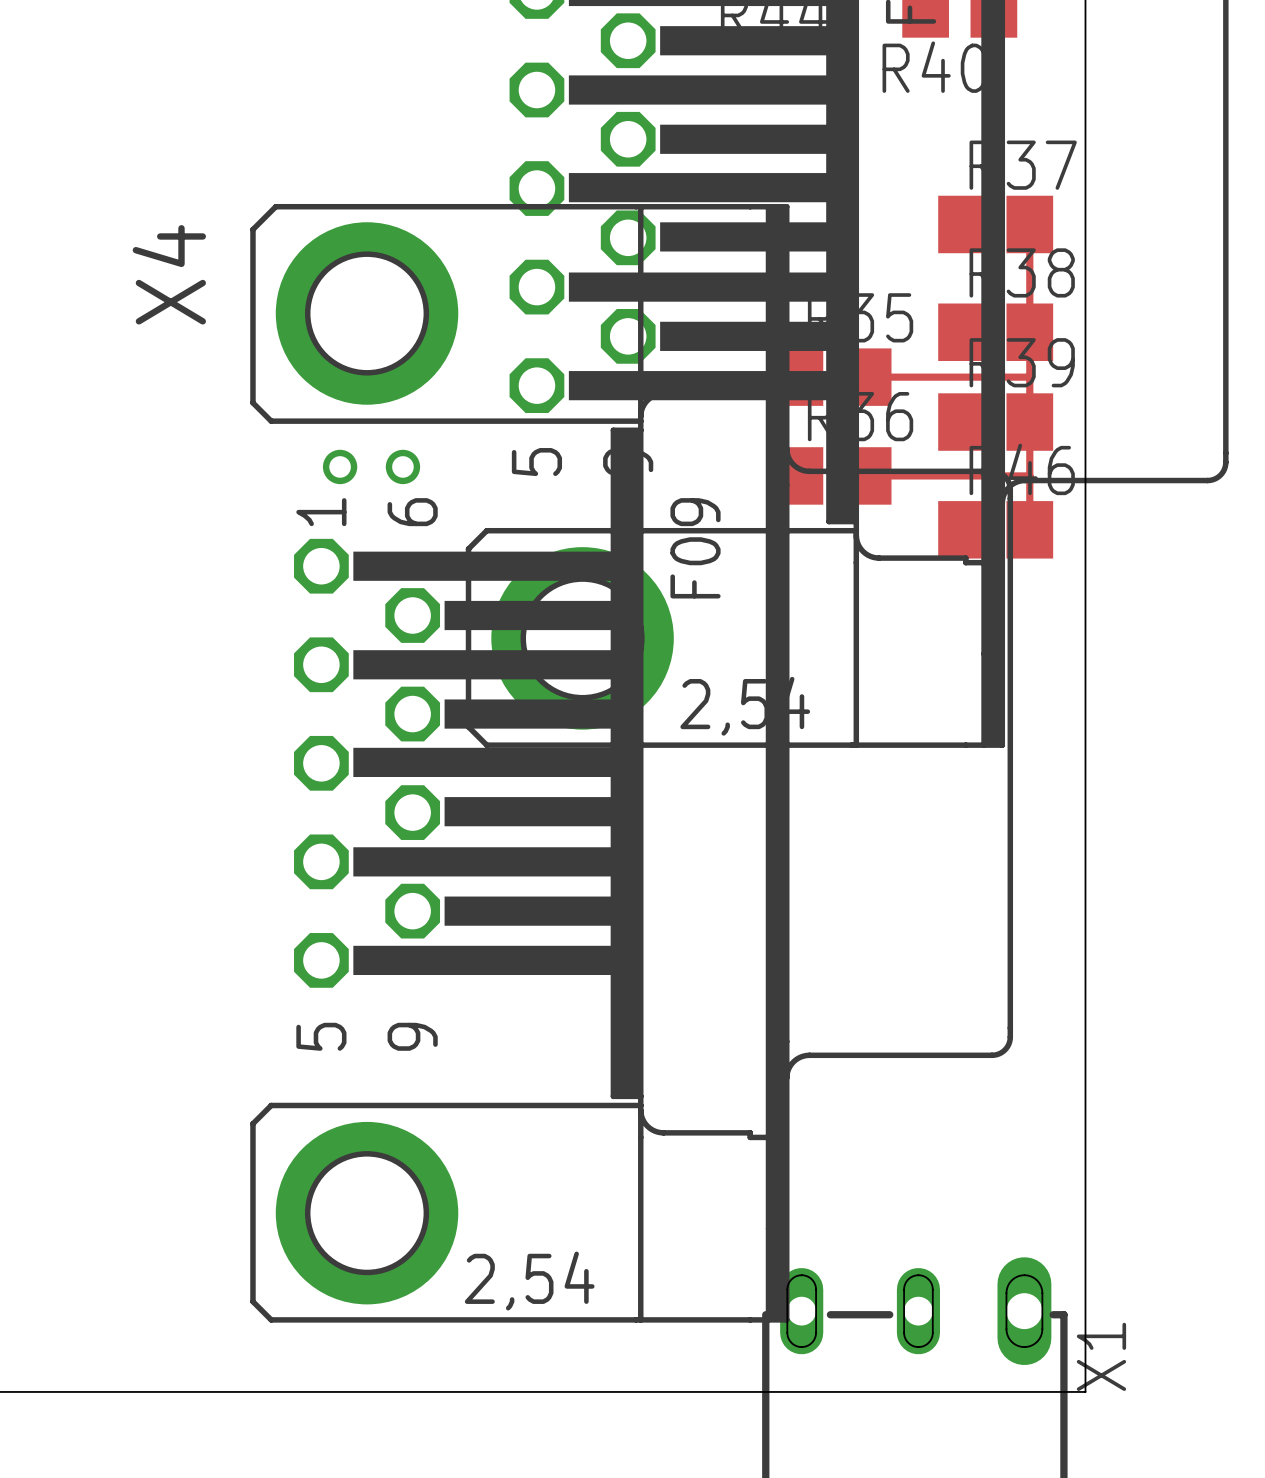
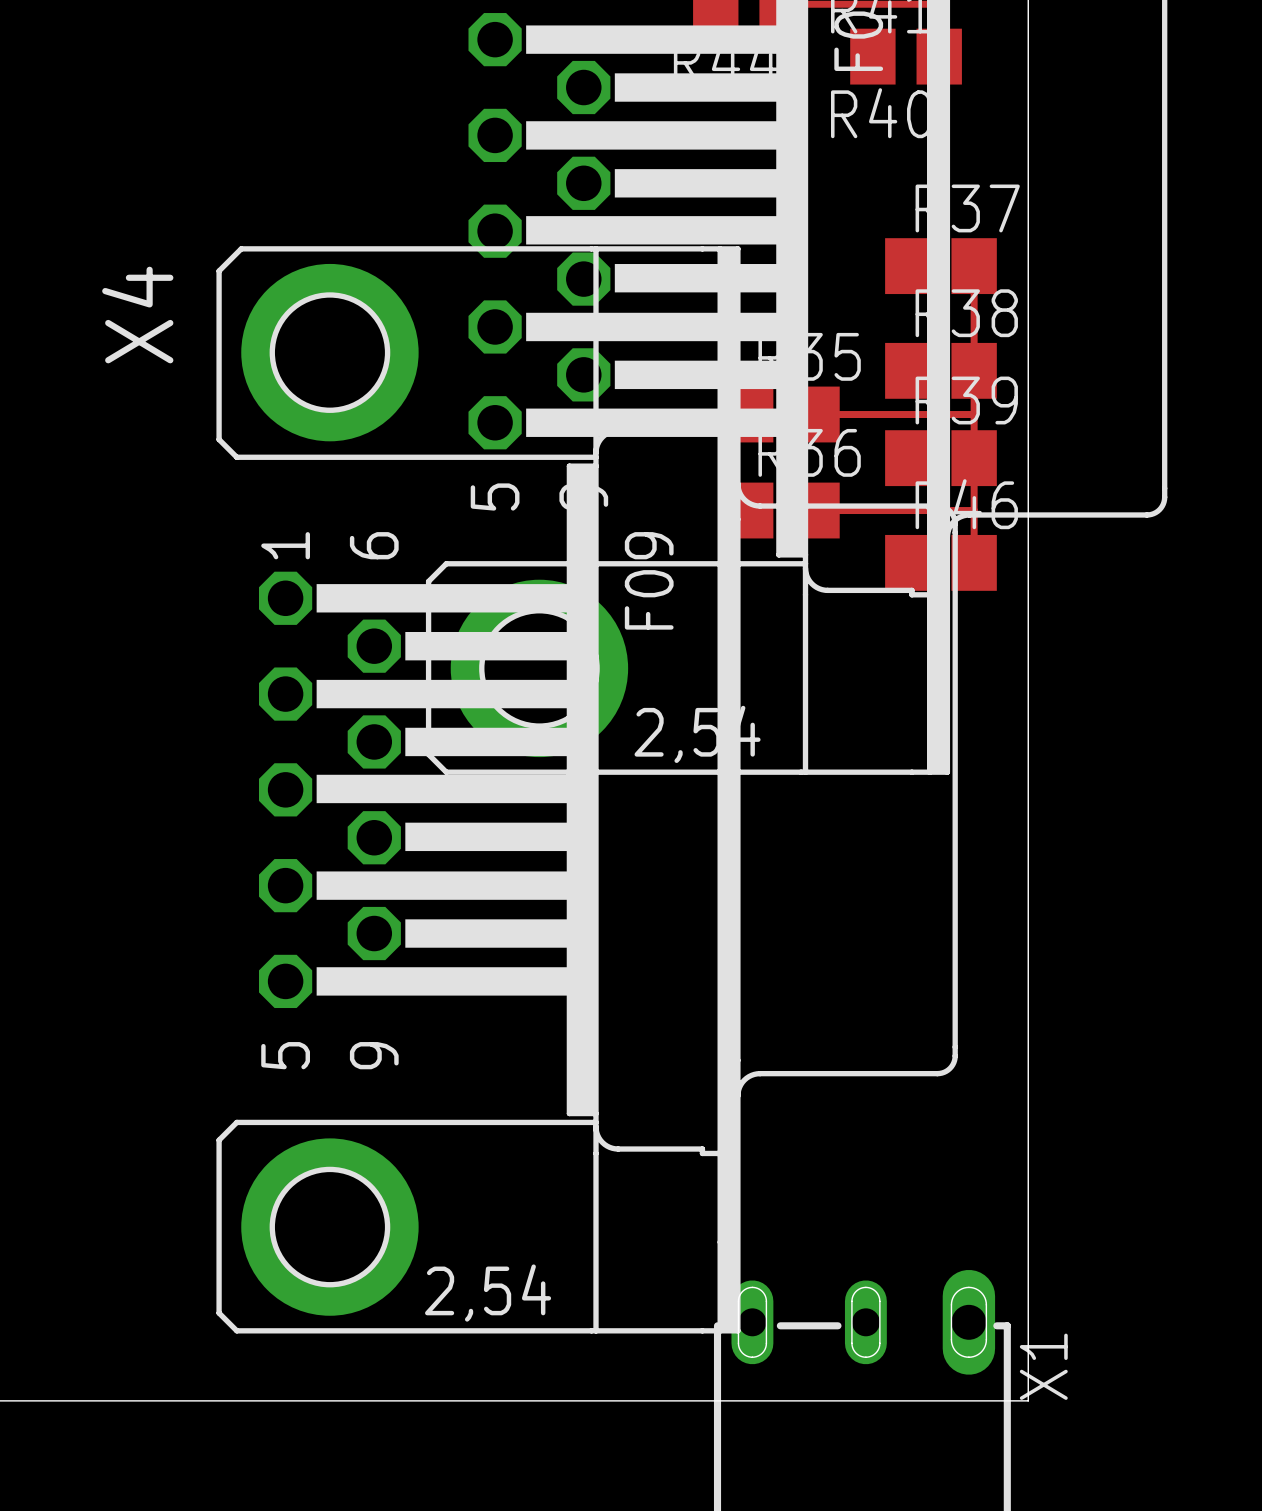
via: (340, 466) -> none
via: (402, 466) -> none

